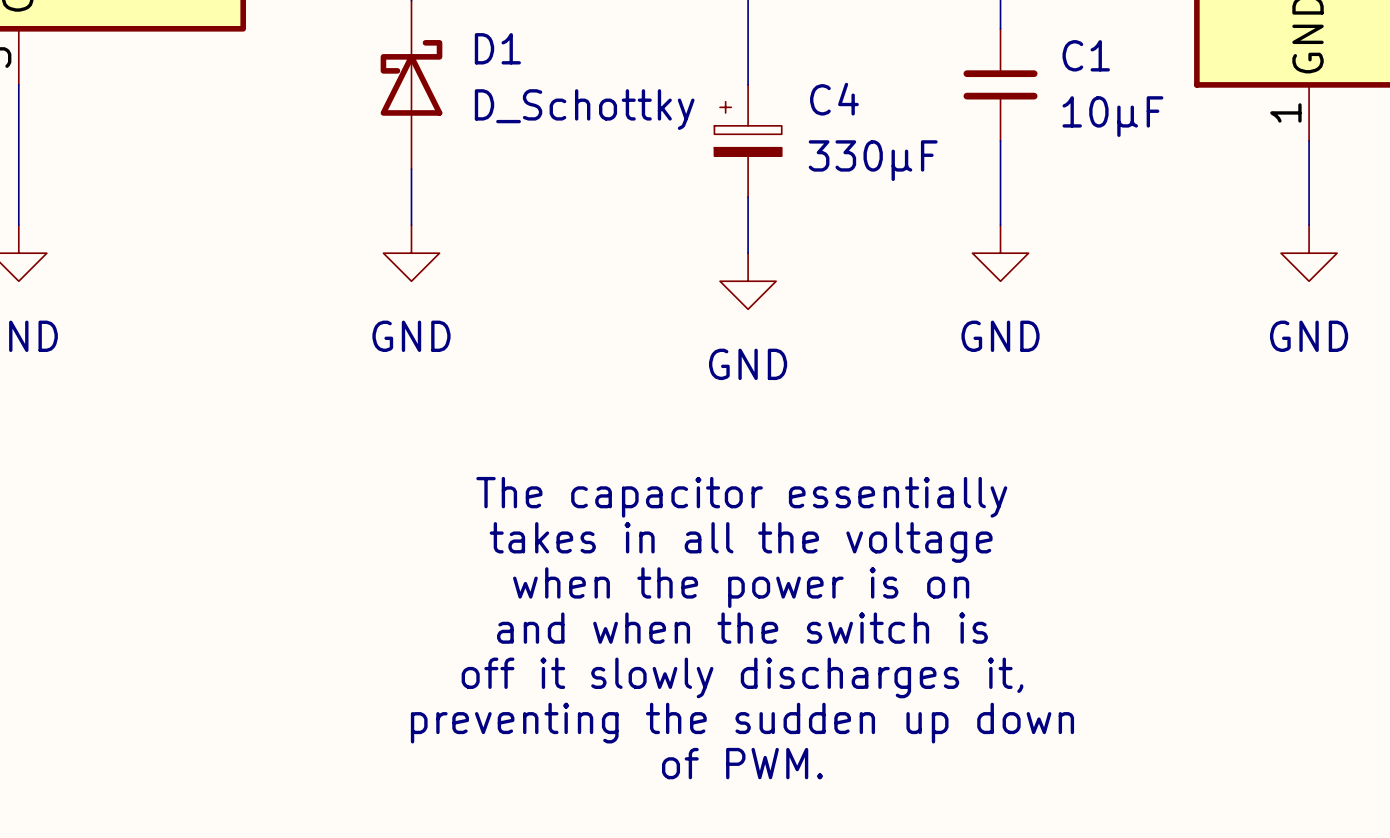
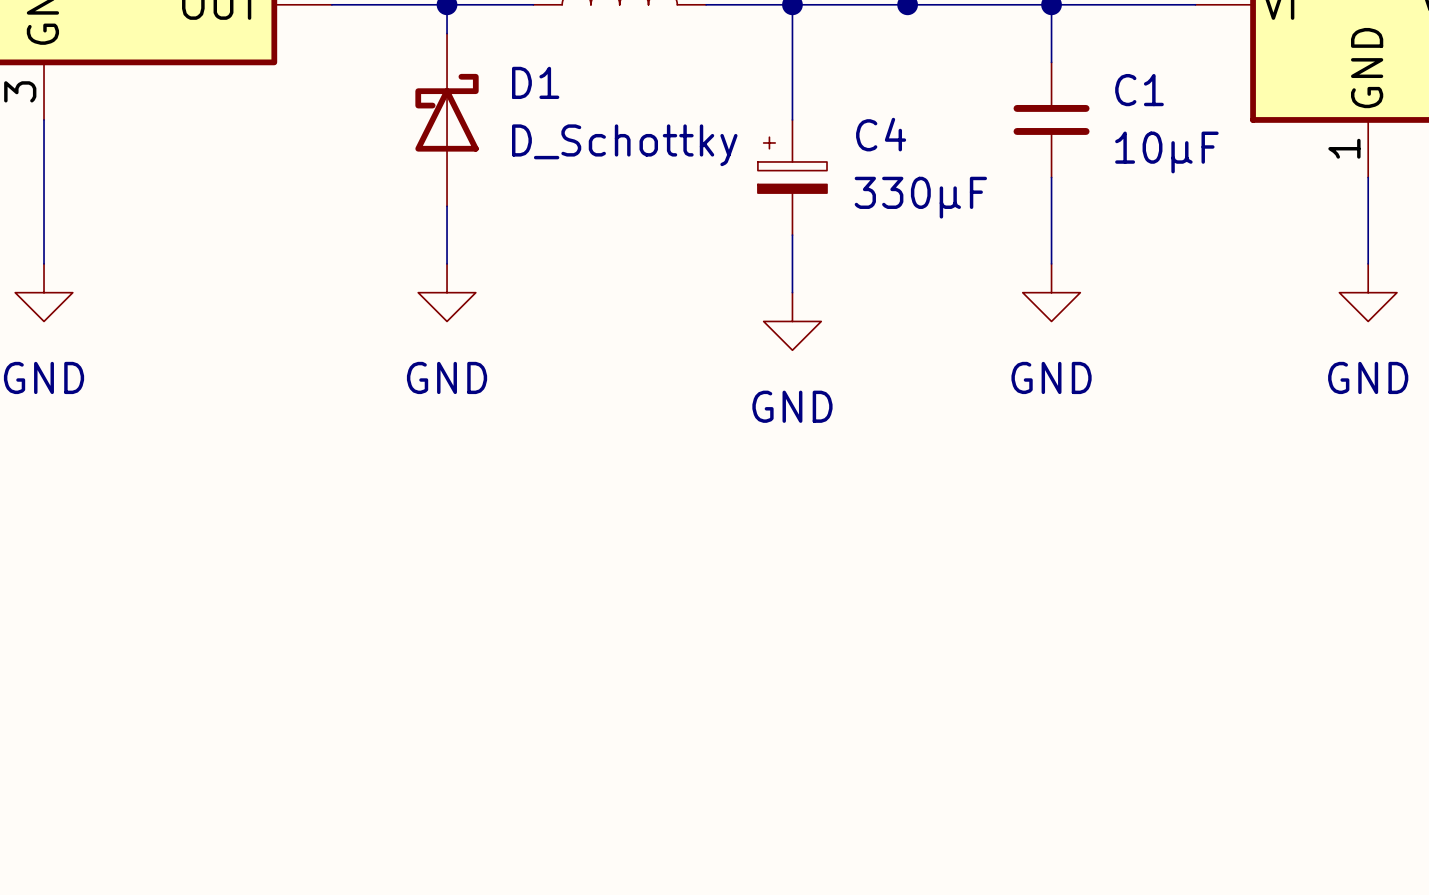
text: The capacitor essentially (741, 497) -> none
text: takes in all the voltage (741, 542) -> none
text: when the power is on (741, 587) -> none
text: and when the switch is (742, 628) -> none
text: off it slowly discharges it, (742, 677) -> none
text: preventing the sudden up down (742, 723) -> none
text: of PWM. (742, 763) -> none

